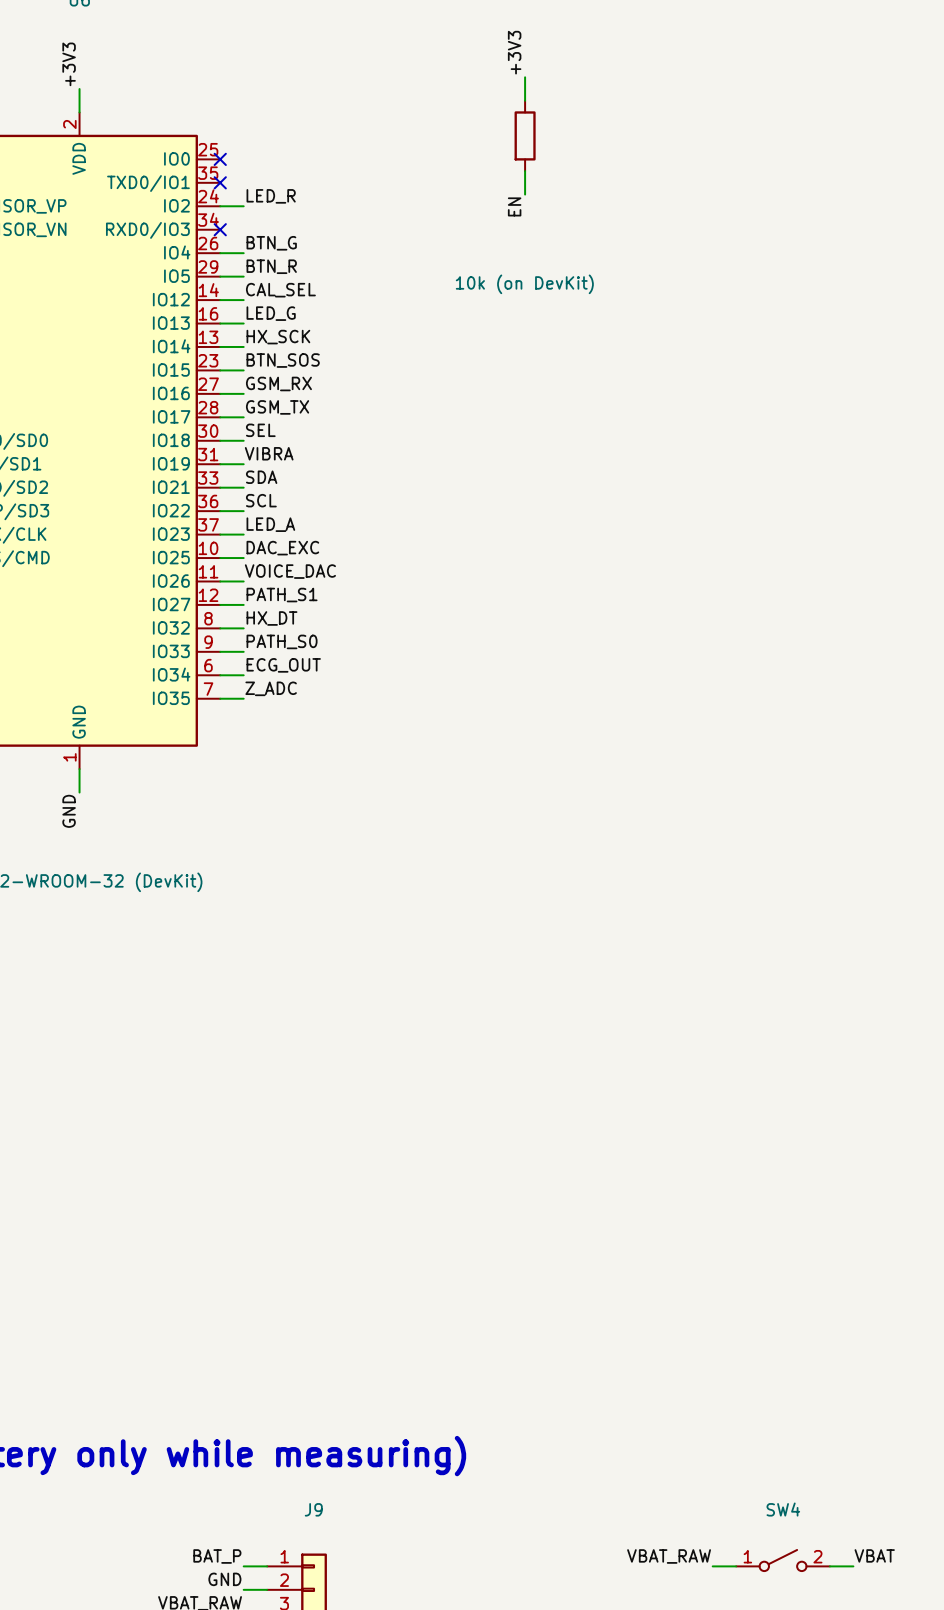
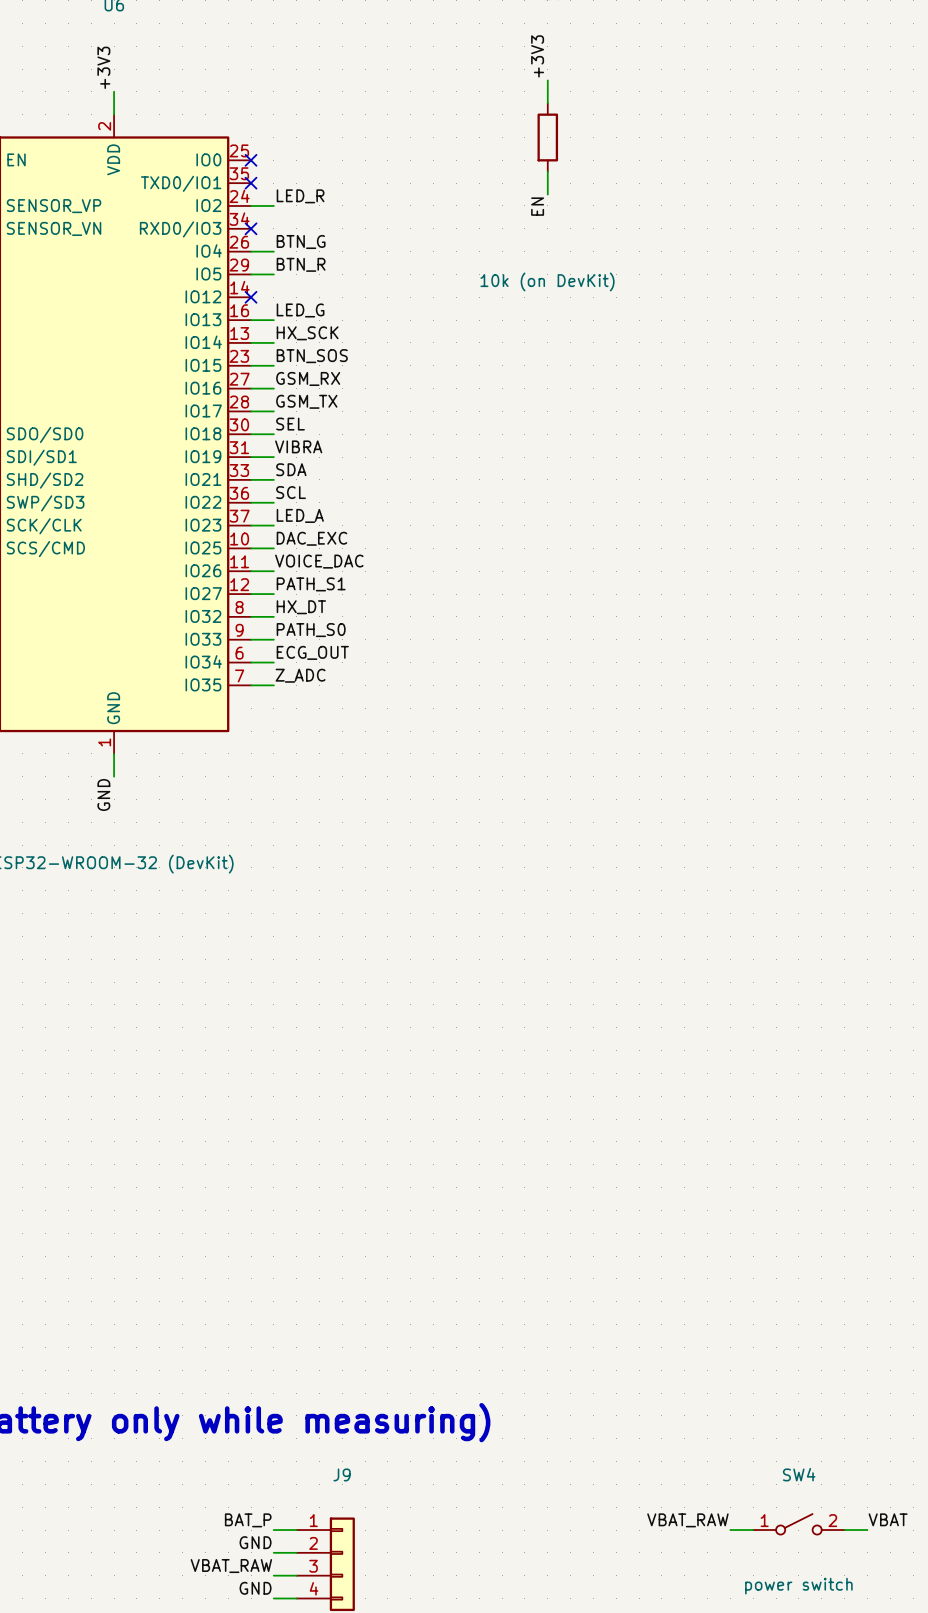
label: CAL_SEL (280, 290) -> none
wire: (220, 300) (243, 300) -> none
no-connect mark: none -> (251, 297)

